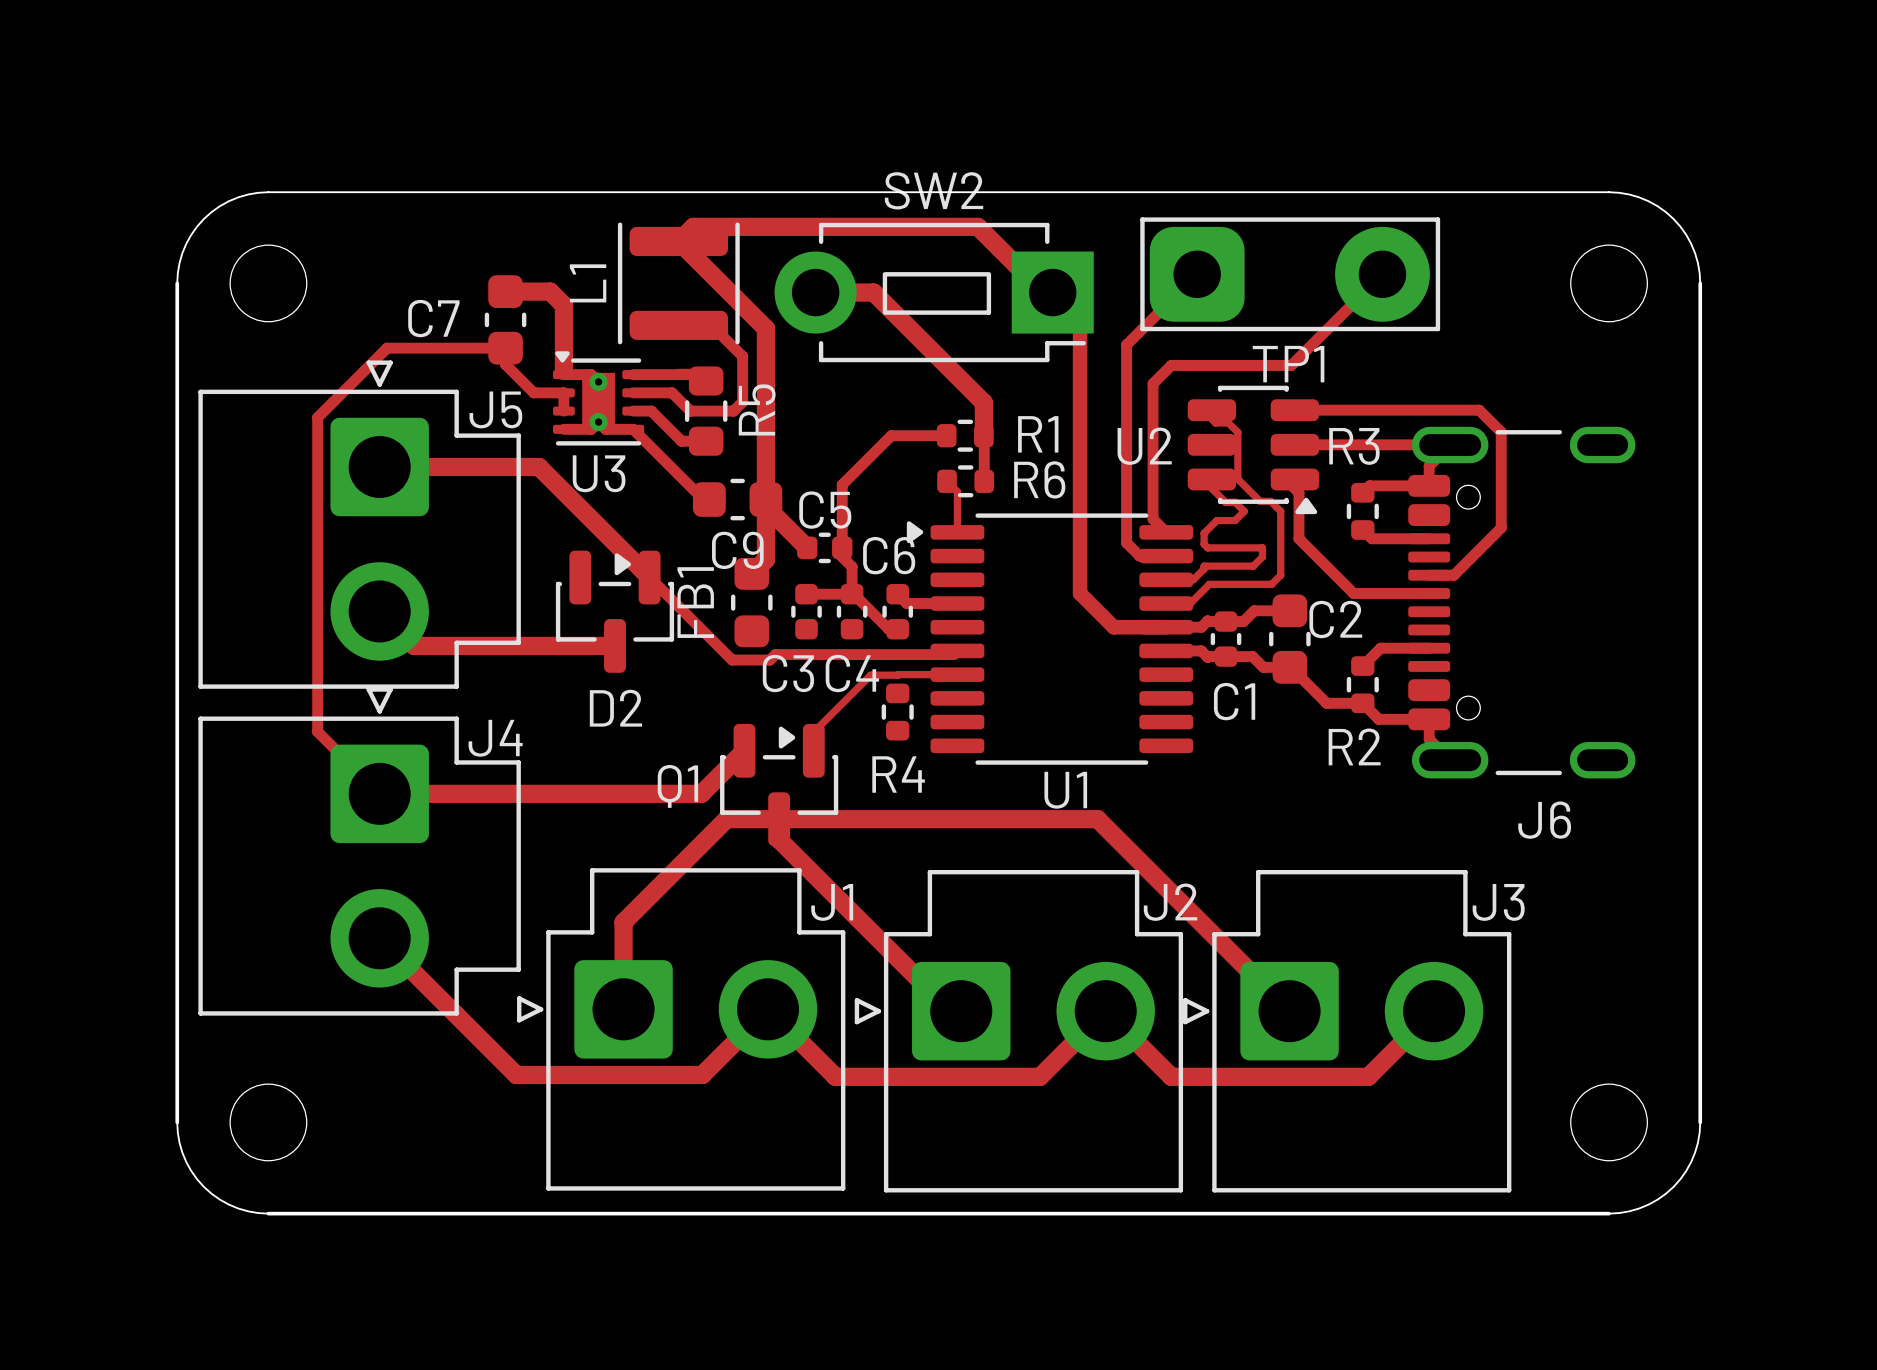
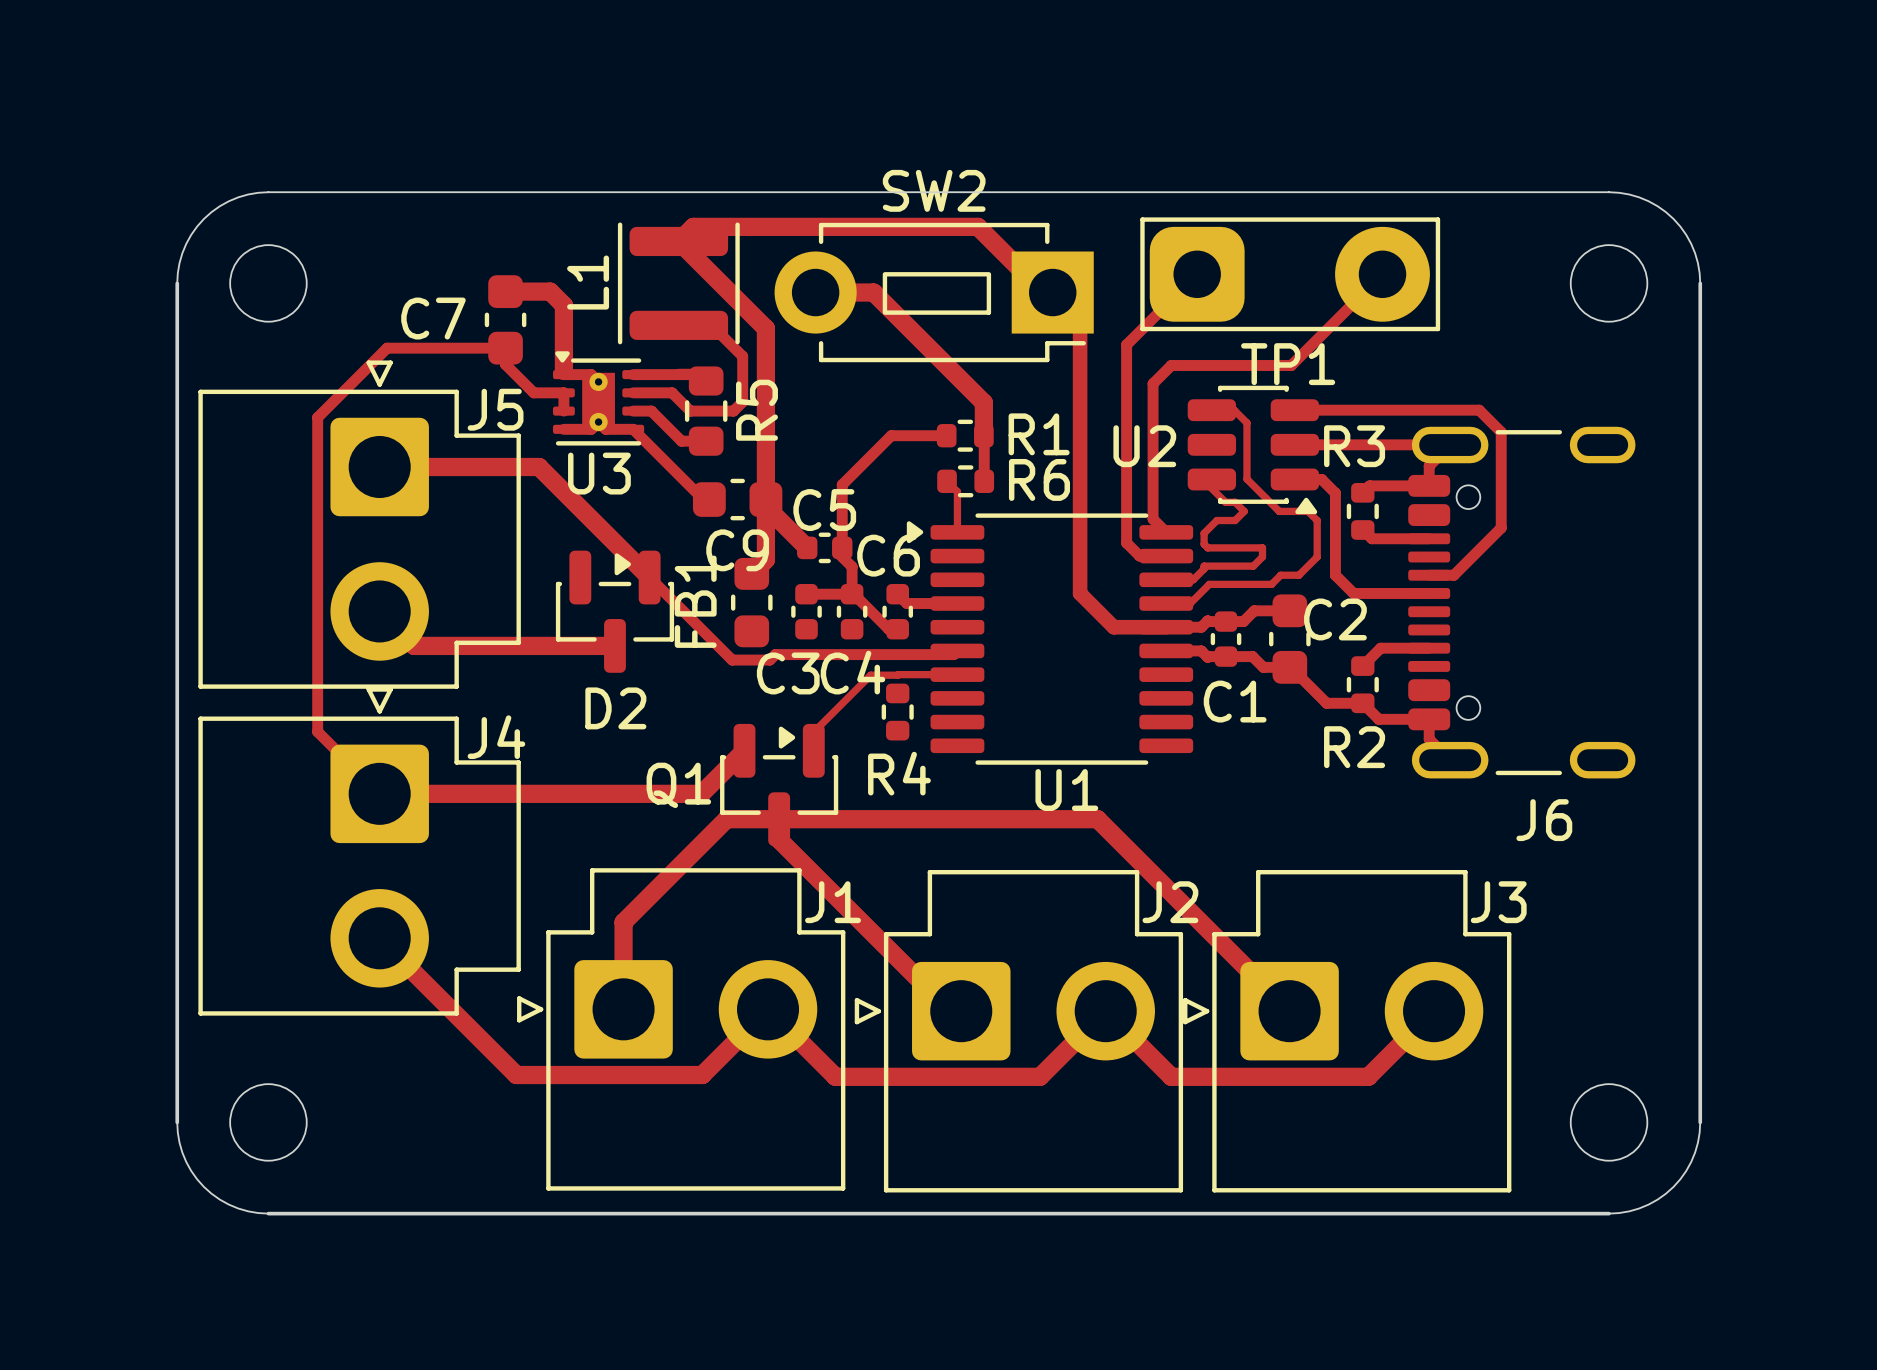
track: (1202, 410) (1215, 422) (1228, 422) (1237, 432) (1237, 479) (1260, 501) (1270, 501) (1280, 511) (1280, 575) -> (1211, 410) (1234, 410) (1246, 422) (1246, 479) (1279, 511) (1308, 511) (1317, 520) (1317, 557) (1298, 575) (1280, 575)
track: (1285, 479) (1298, 492) (1298, 538) (1335, 575) -> (1294, 479) (1321, 479) (1335, 493) (1335, 575)

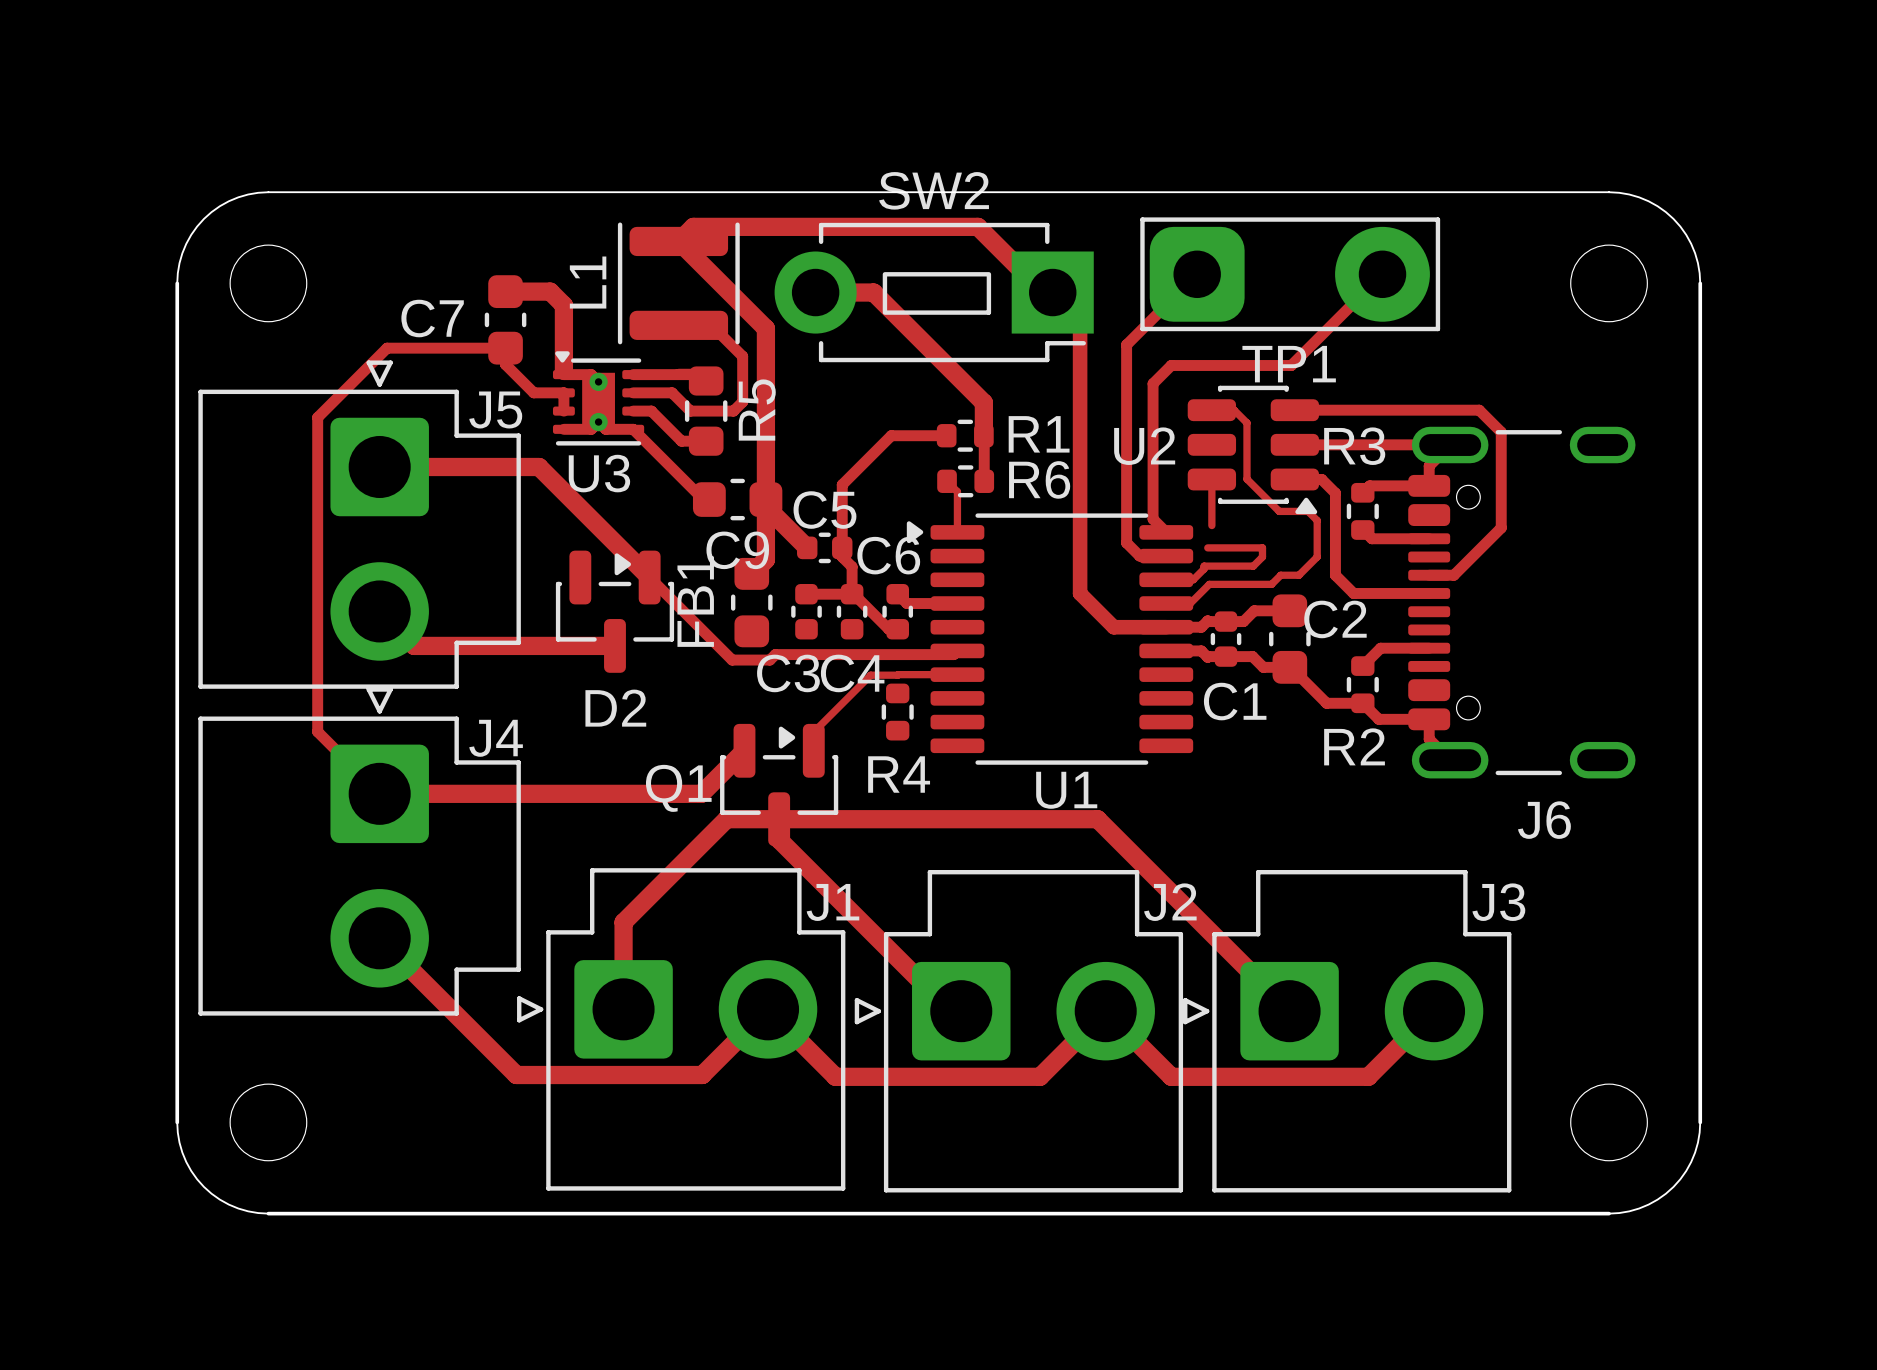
track: (1202, 479) (1225, 502) (1235, 502) (1244, 511) (1235, 520) (1216, 520) (1204, 533) (1204, 544) (1207, 547) -> none
track: none -> (1211, 479) (1211, 525)

